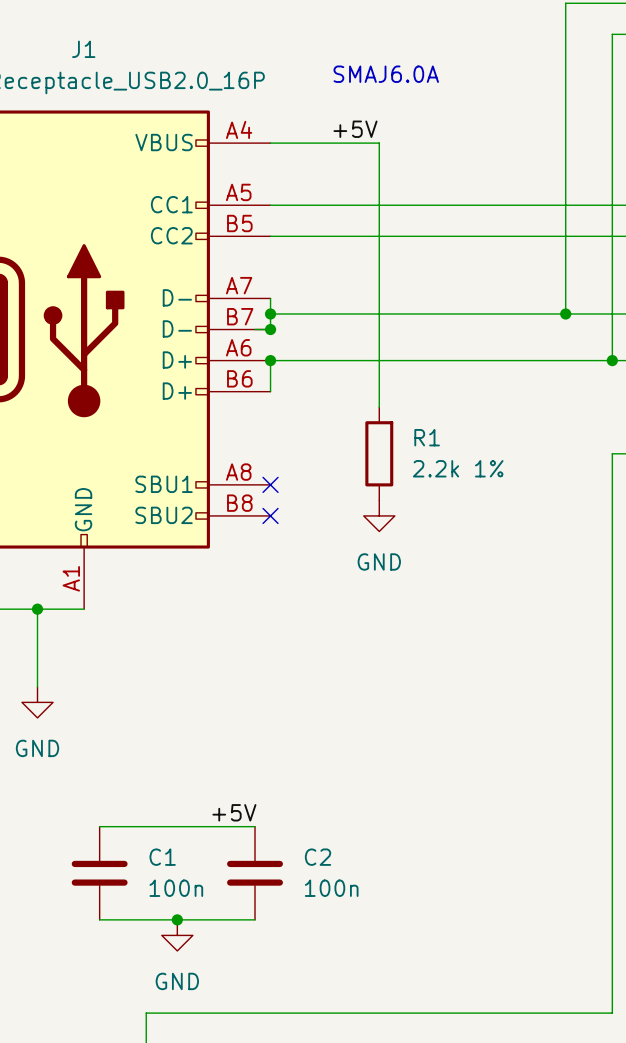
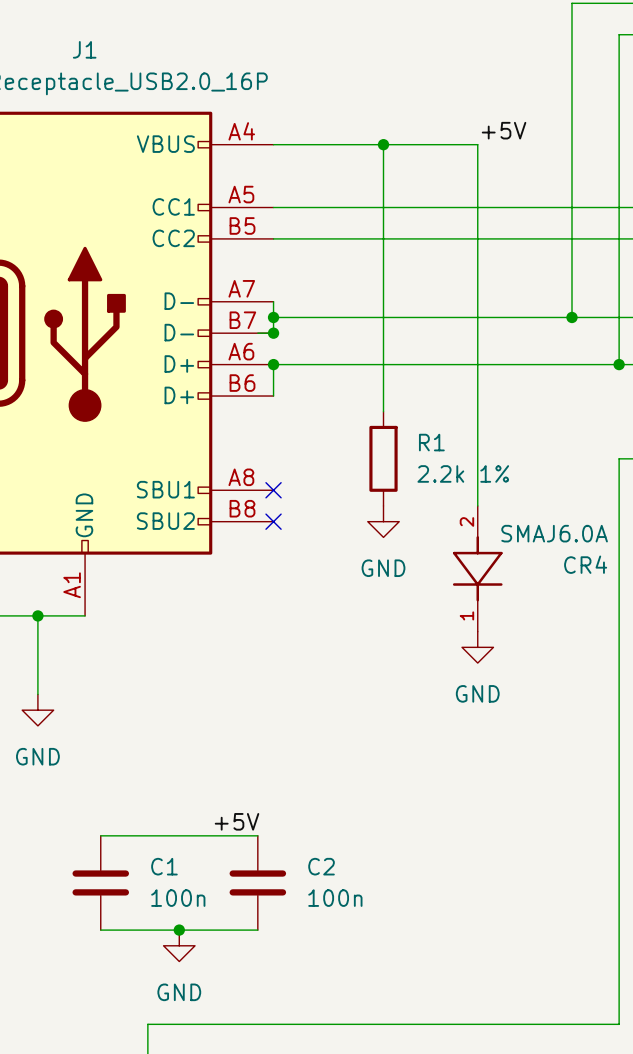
text: SMAJ6.0A (386, 74) -> none
label position: +5V (355, 129) -> +5V (504, 130)
wire: none -> (383, 144) (477, 144) (477, 505)
junction: none -> (383, 144)
CR4: none -> SMAJ6.0A (477, 568)
power symbol: none -> GND (477, 647)

